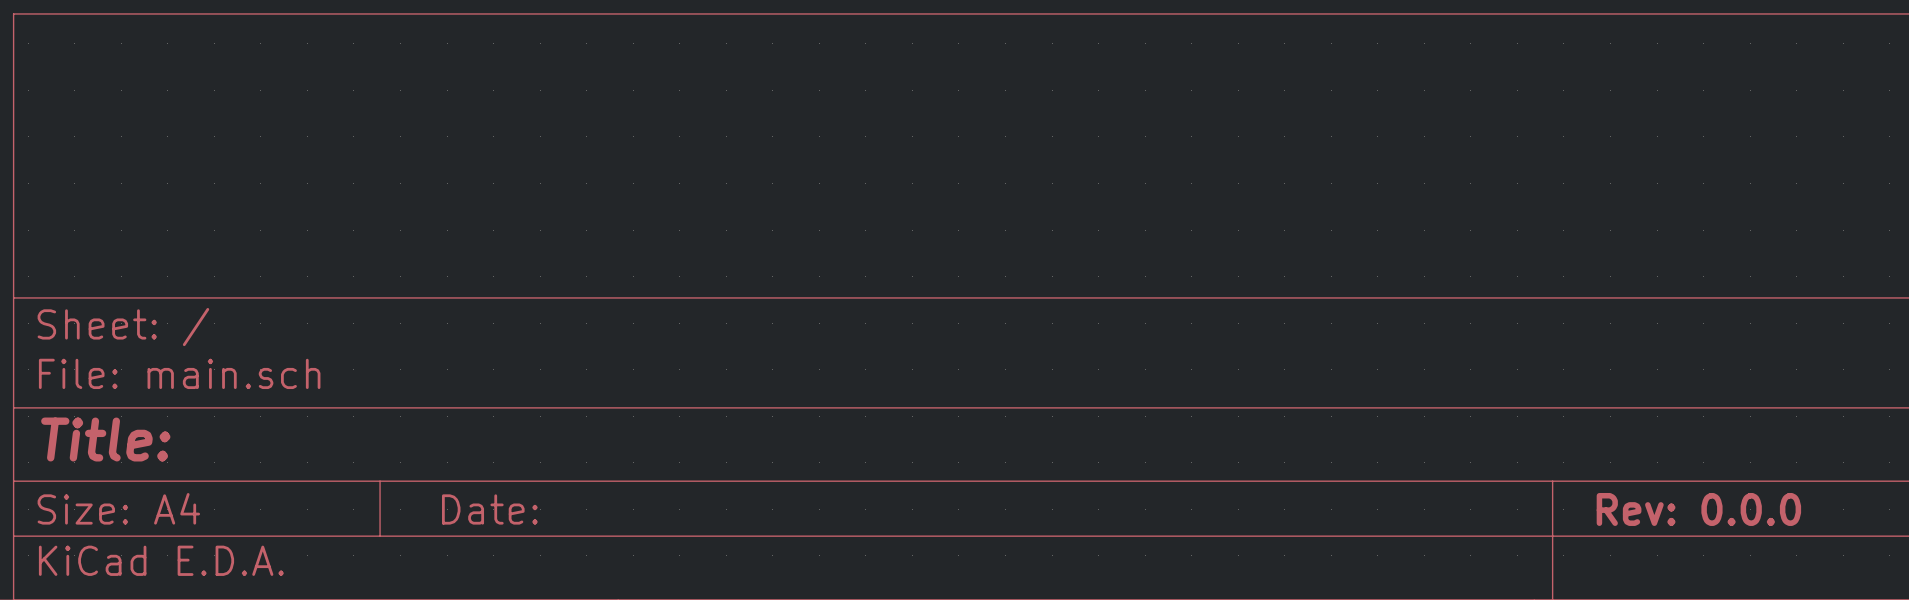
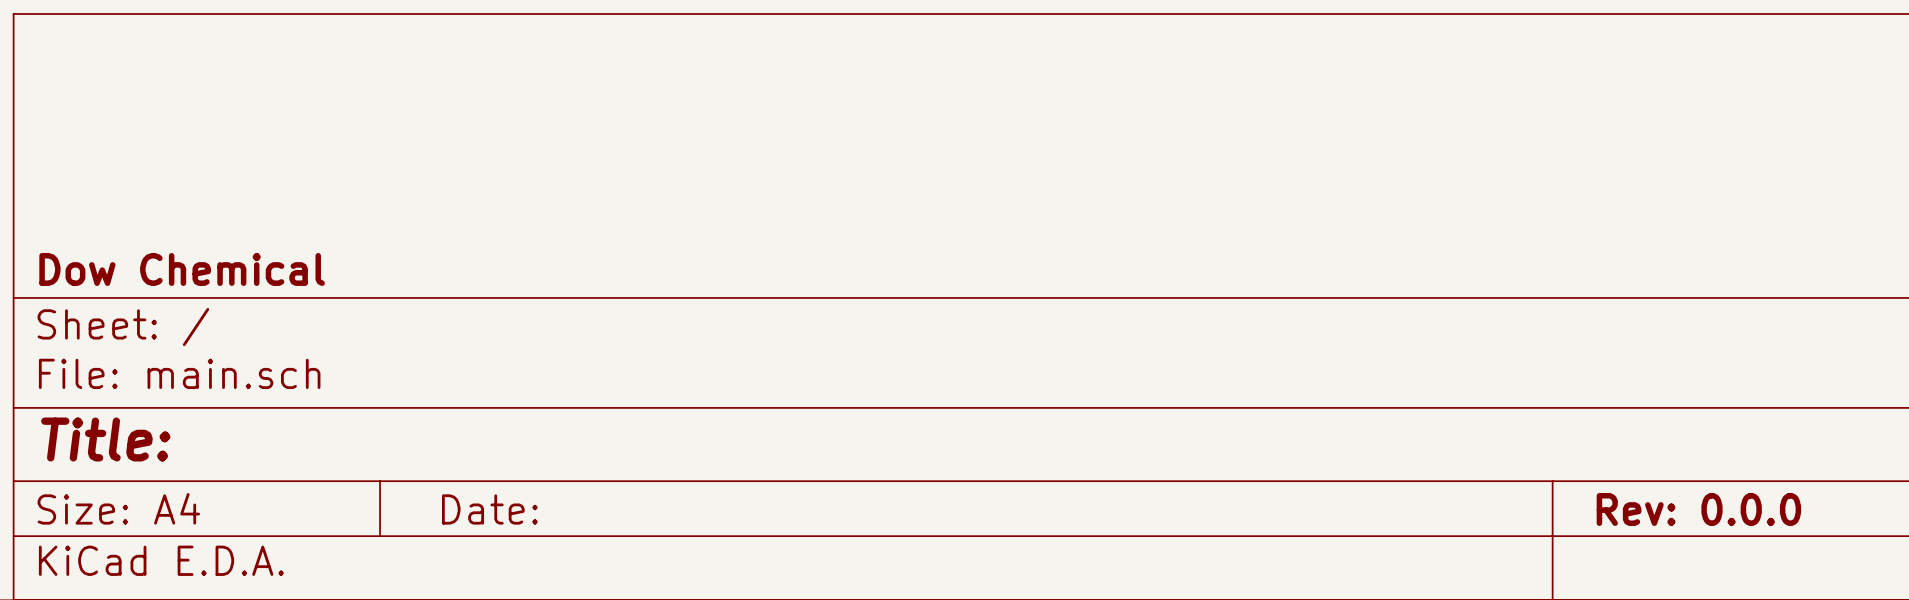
title block: none -> Dow Chemical (182, 269)

